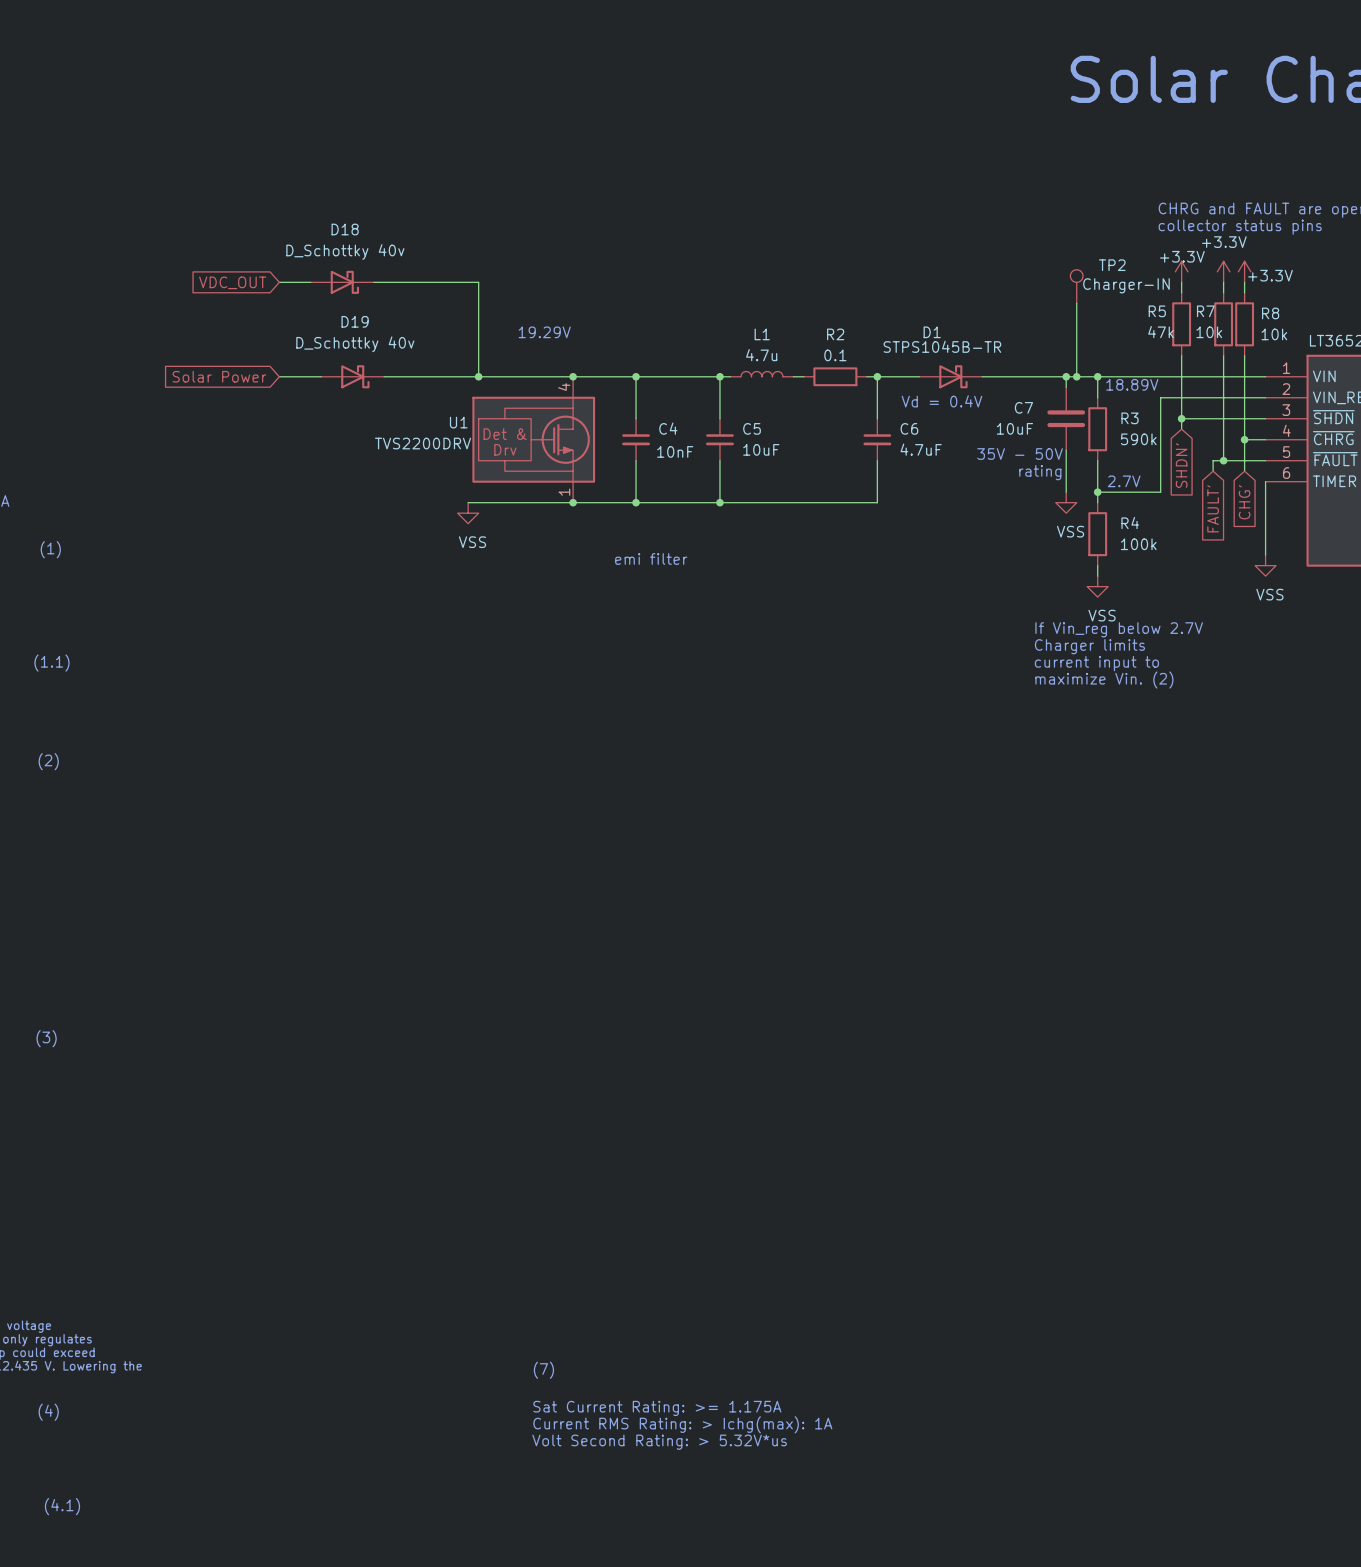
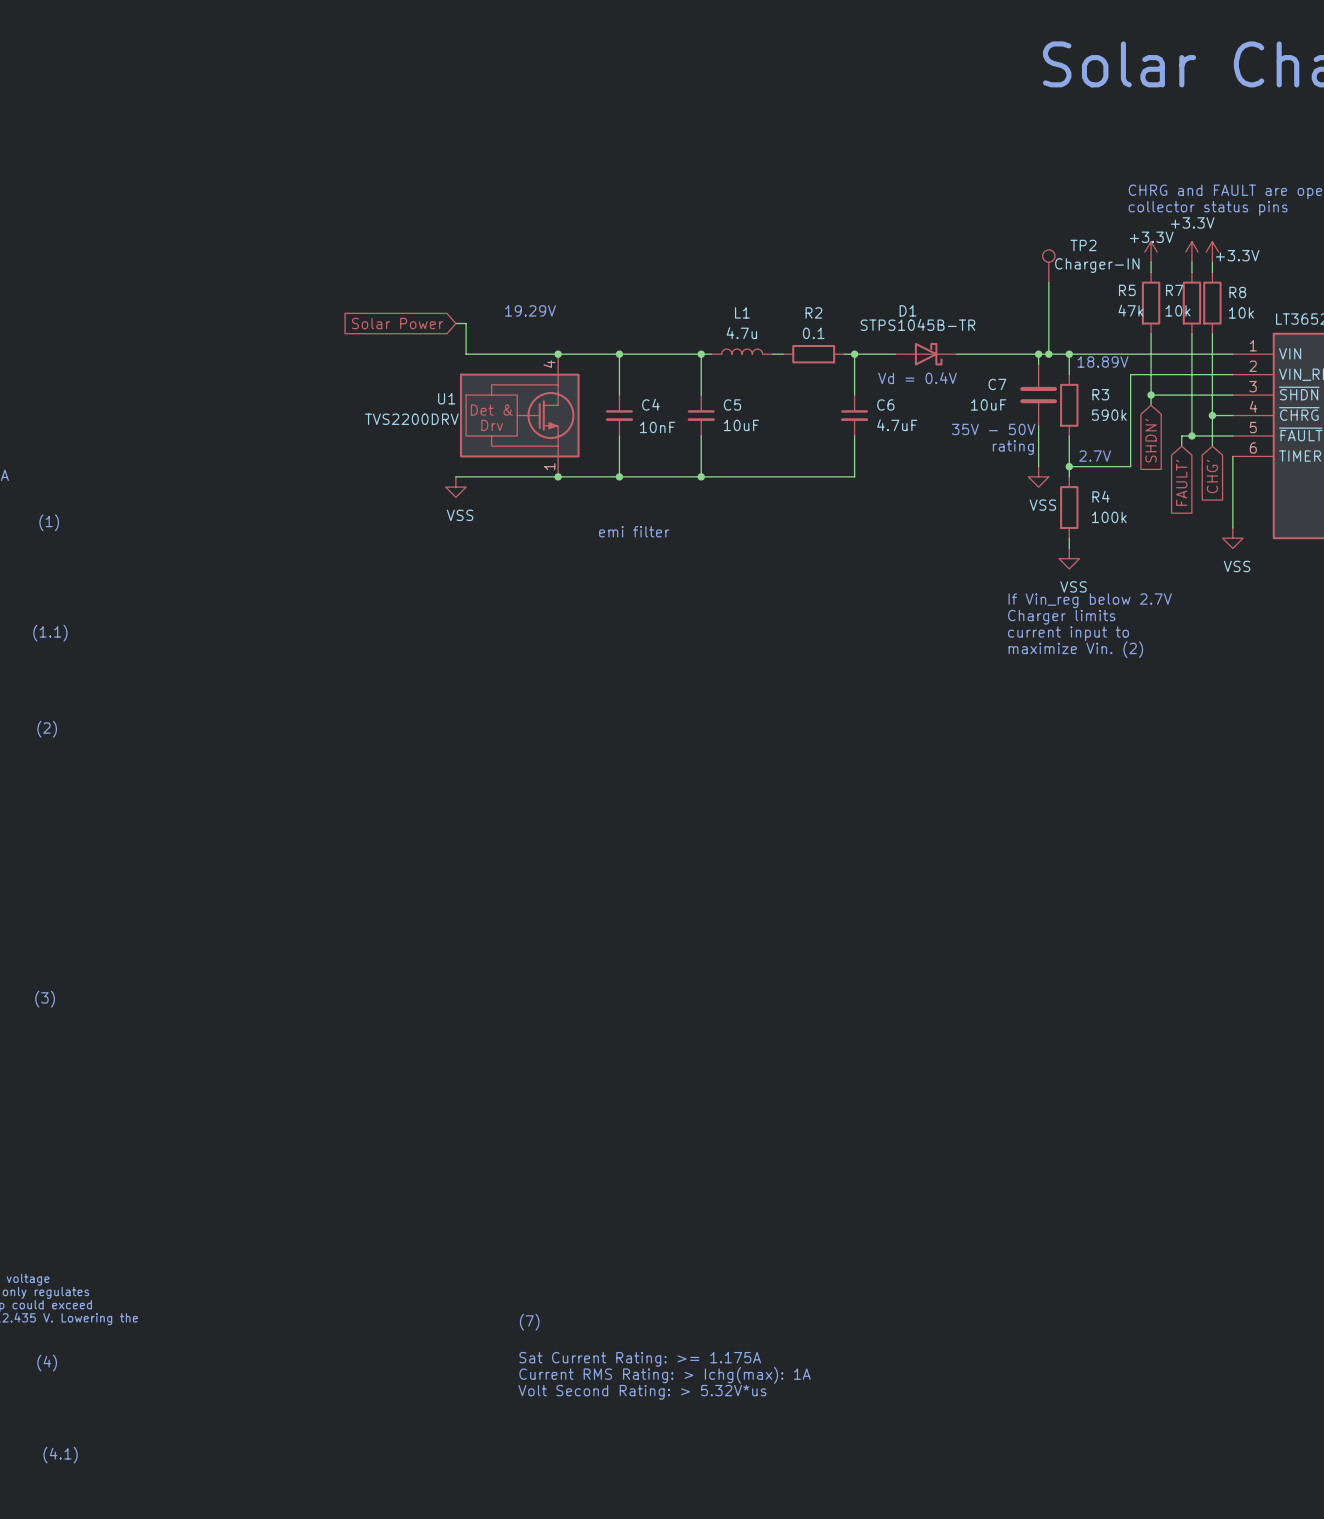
global label: VDC_OUT (232, 282) -> none
wire: (279, 282) (310, 282) -> none
D18: D_Schottky 40v (342, 282) -> none
wire: (373, 282) (478, 282) (478, 345) -> (455, 323) (466, 323)
global label position: Solar Power (219, 376) -> Solar Power (397, 323)
wire: (279, 376) (321, 376) -> none
D19: D_Schottky 40v (352, 376) -> none
wire: (384, 376) (478, 376) -> none
junction: (478, 376) -> none

